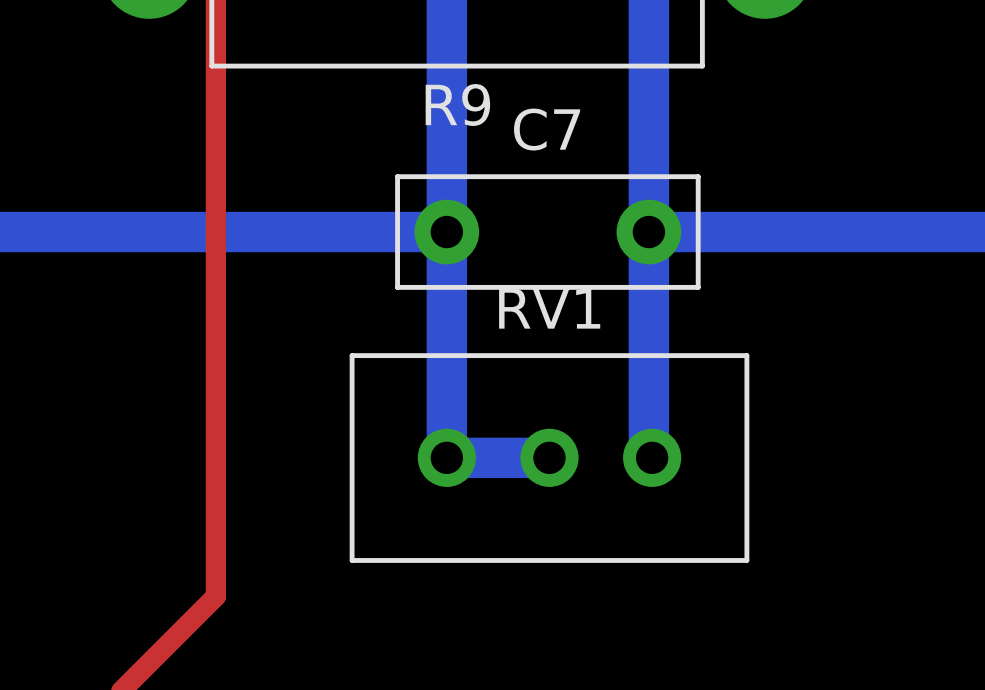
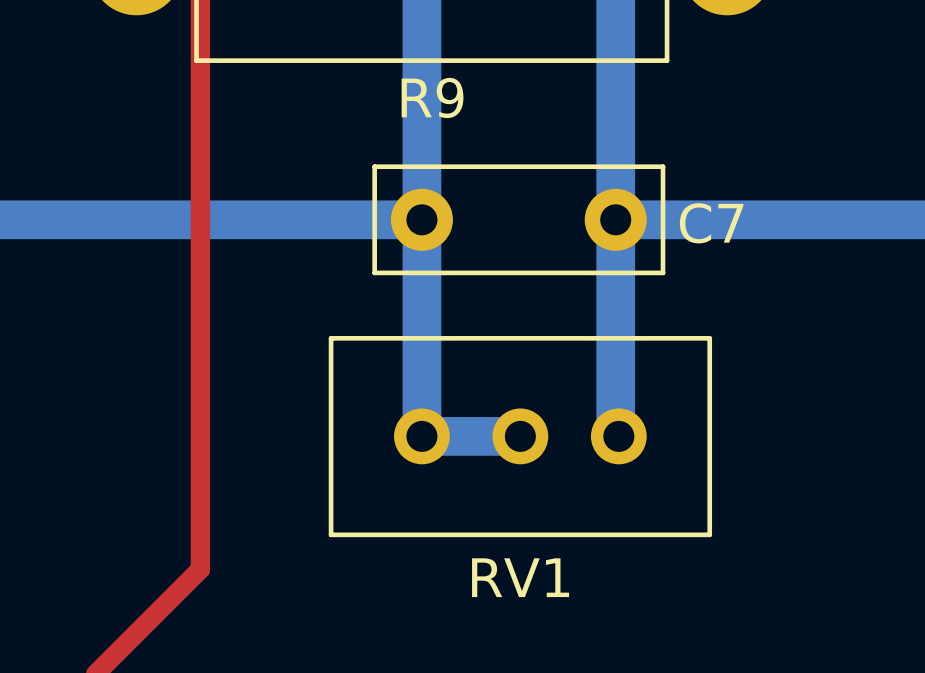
C7 name position: C7 (547, 129) -> C7 (711, 223)
RV1 name position: RV1 (549, 308) -> RV1 (520, 577)

